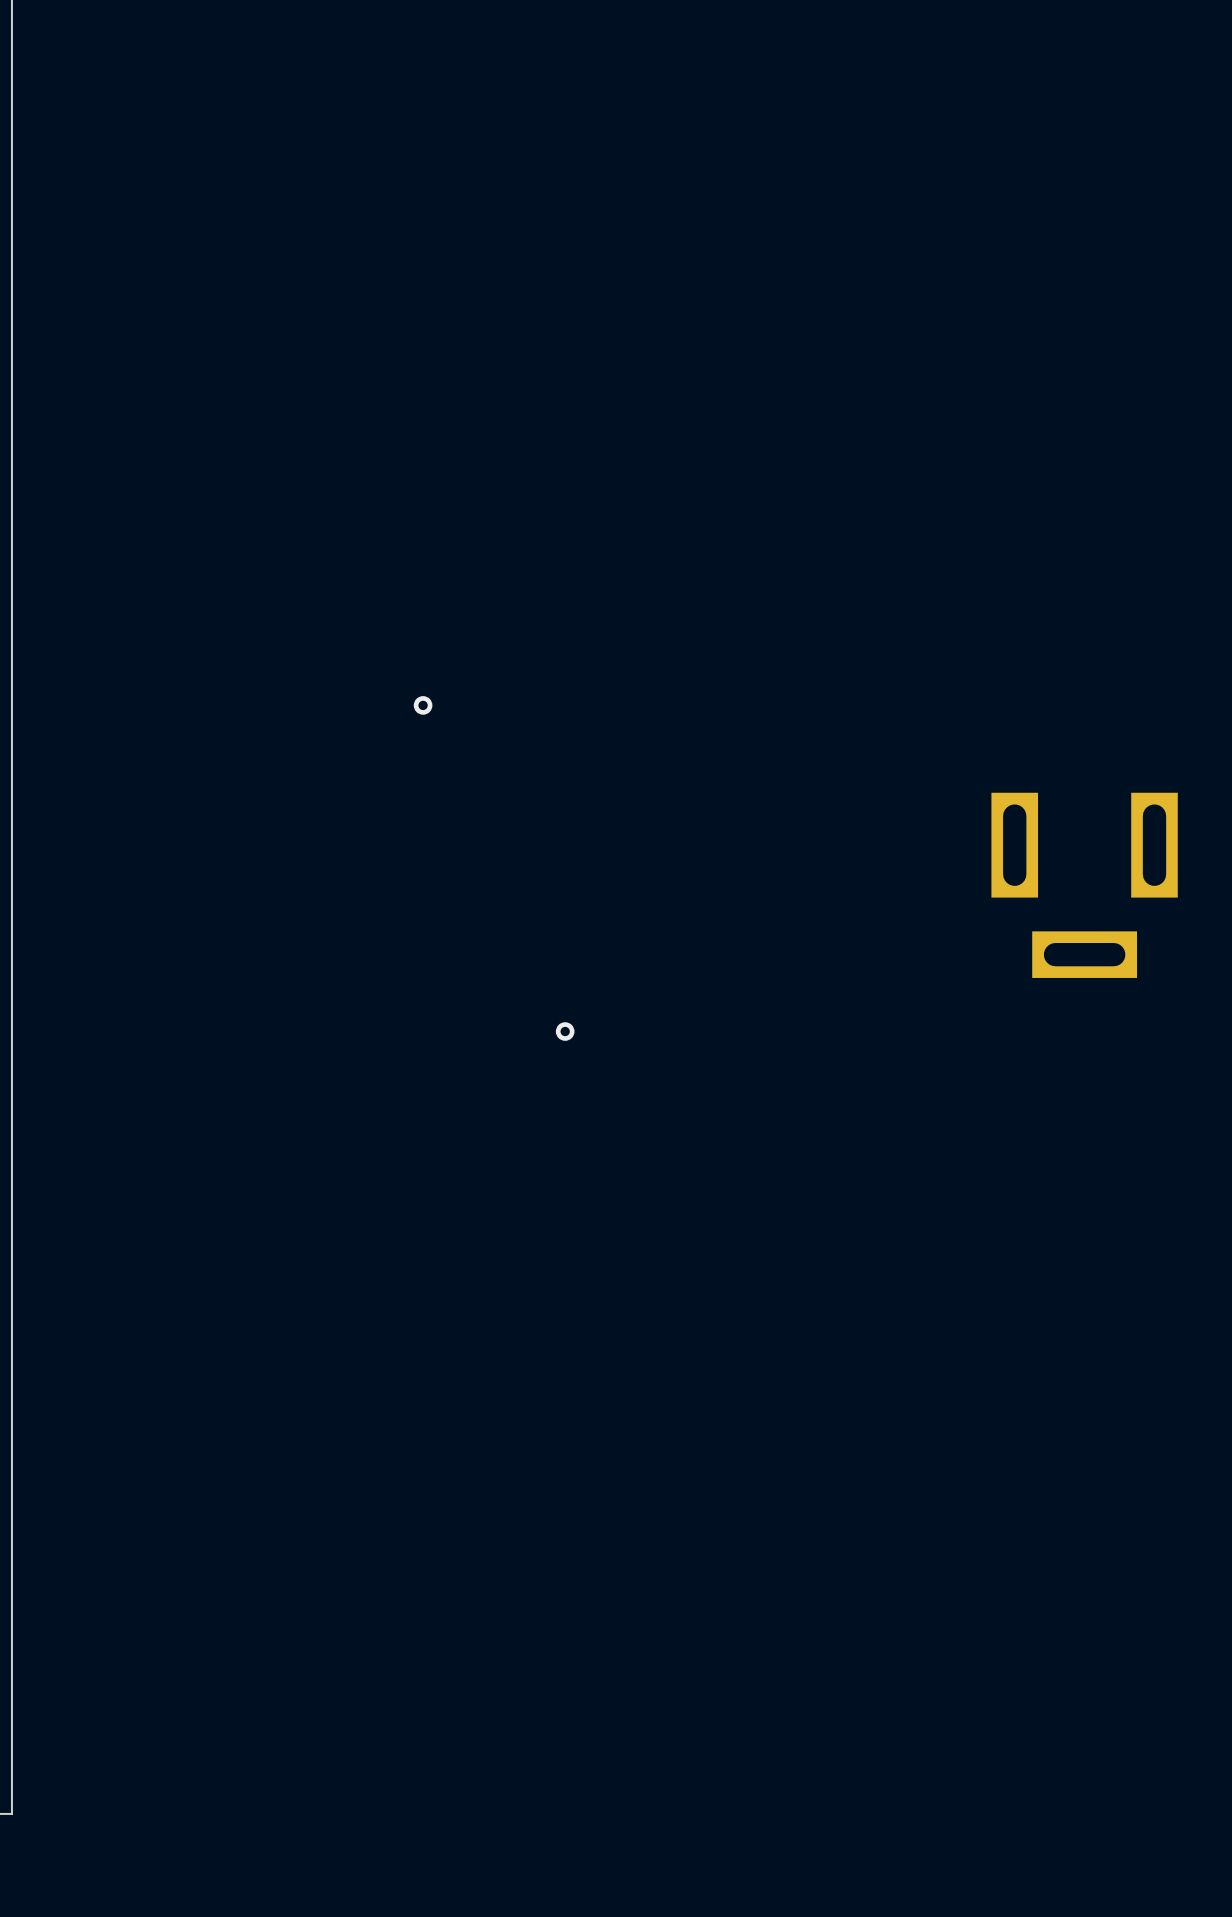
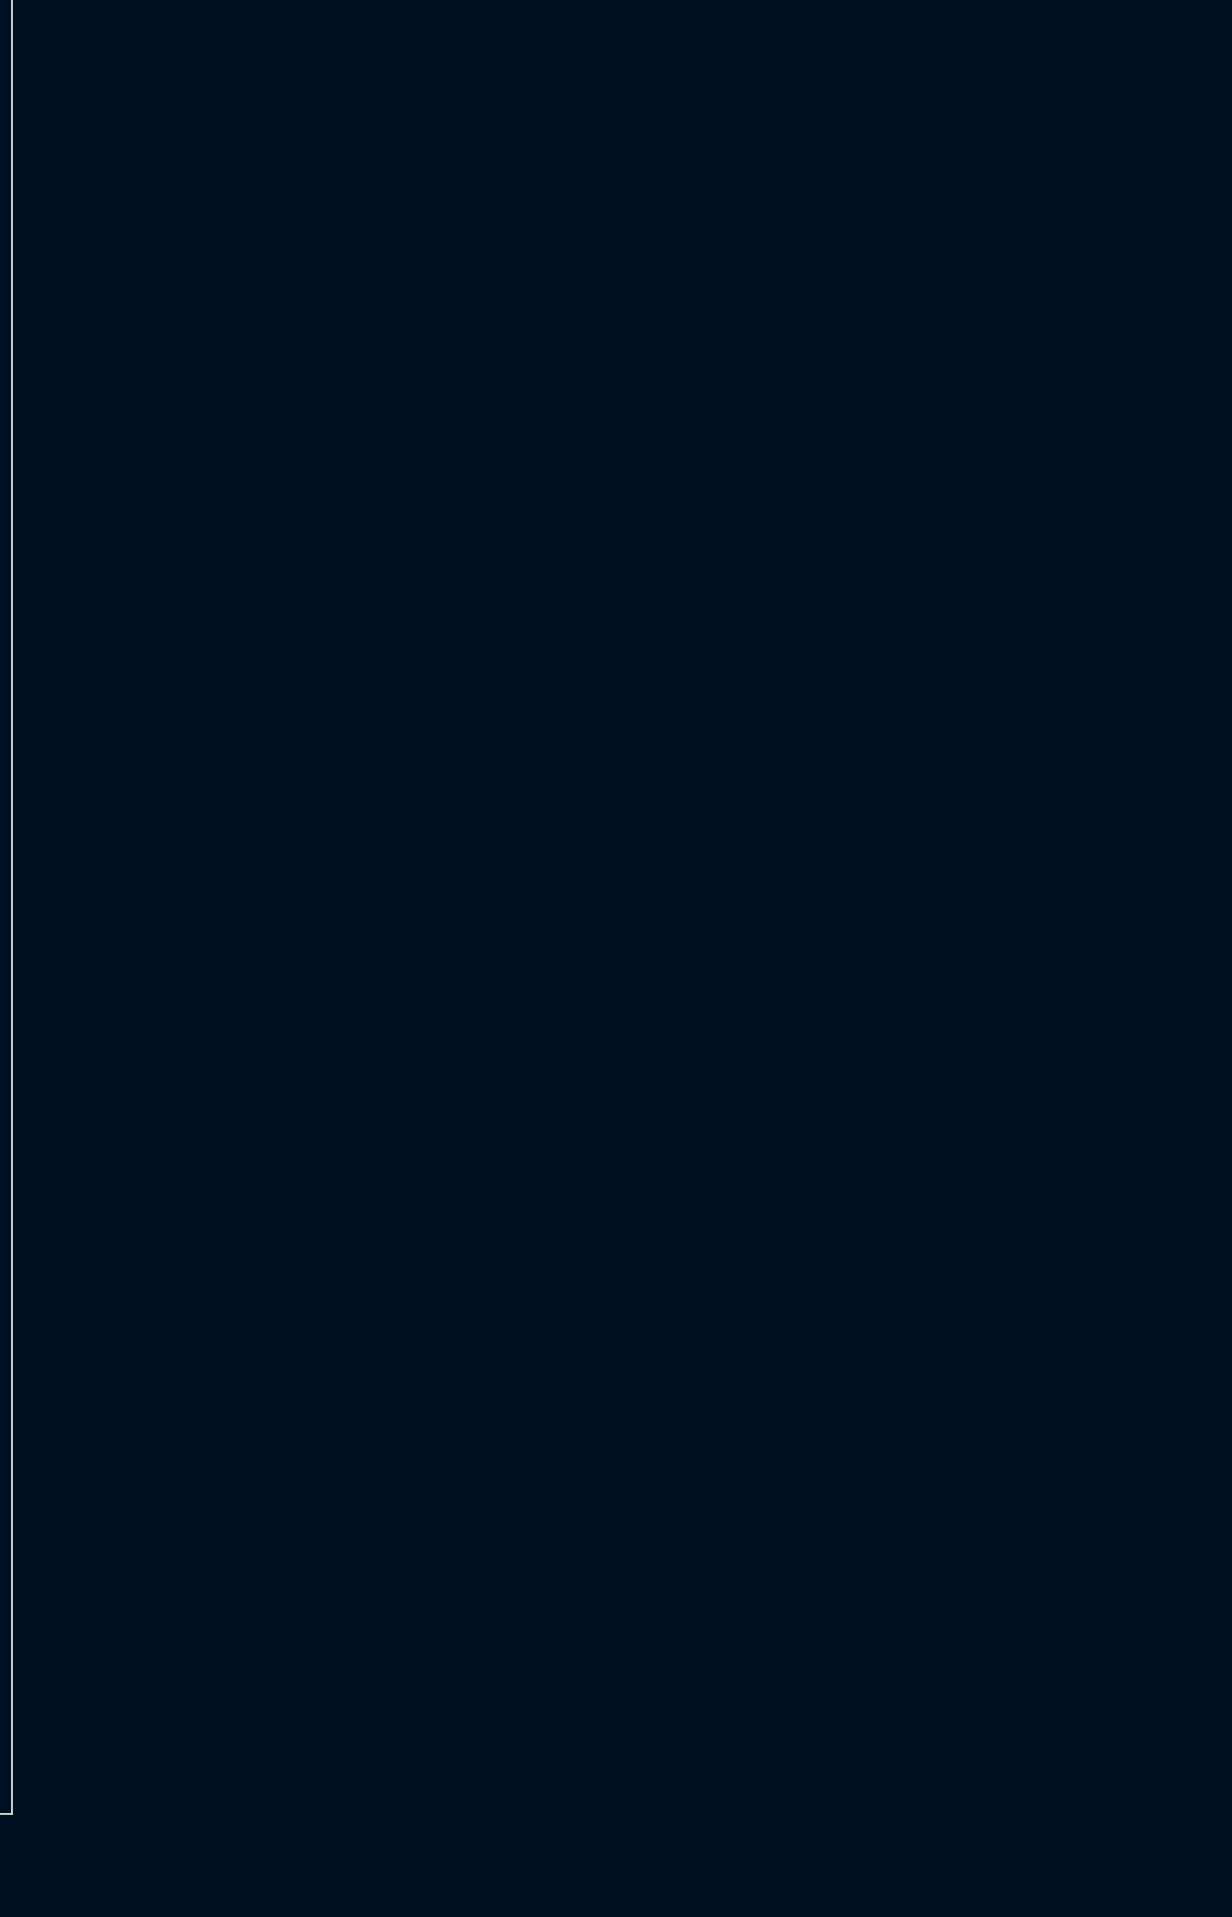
via: (423, 705) -> none
part: (1084, 885) -> none
via: (565, 1031) -> none

